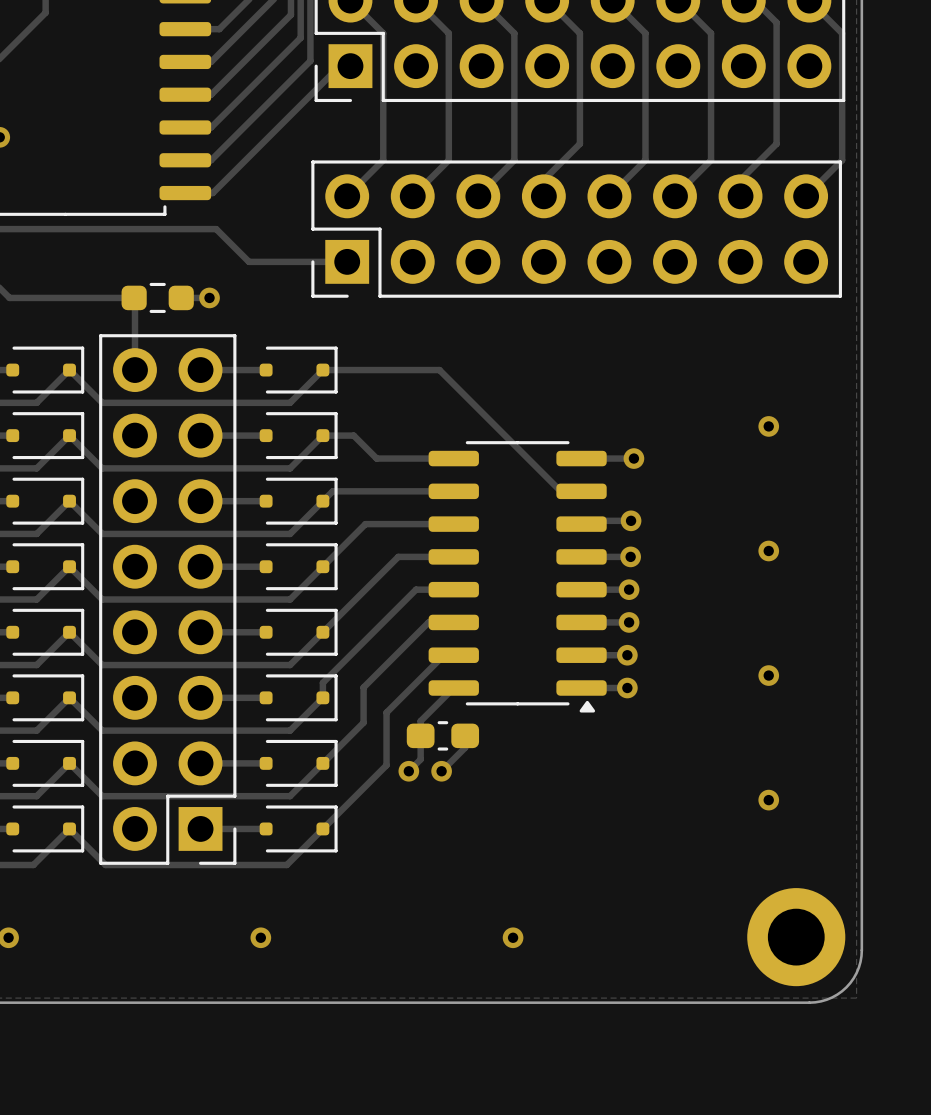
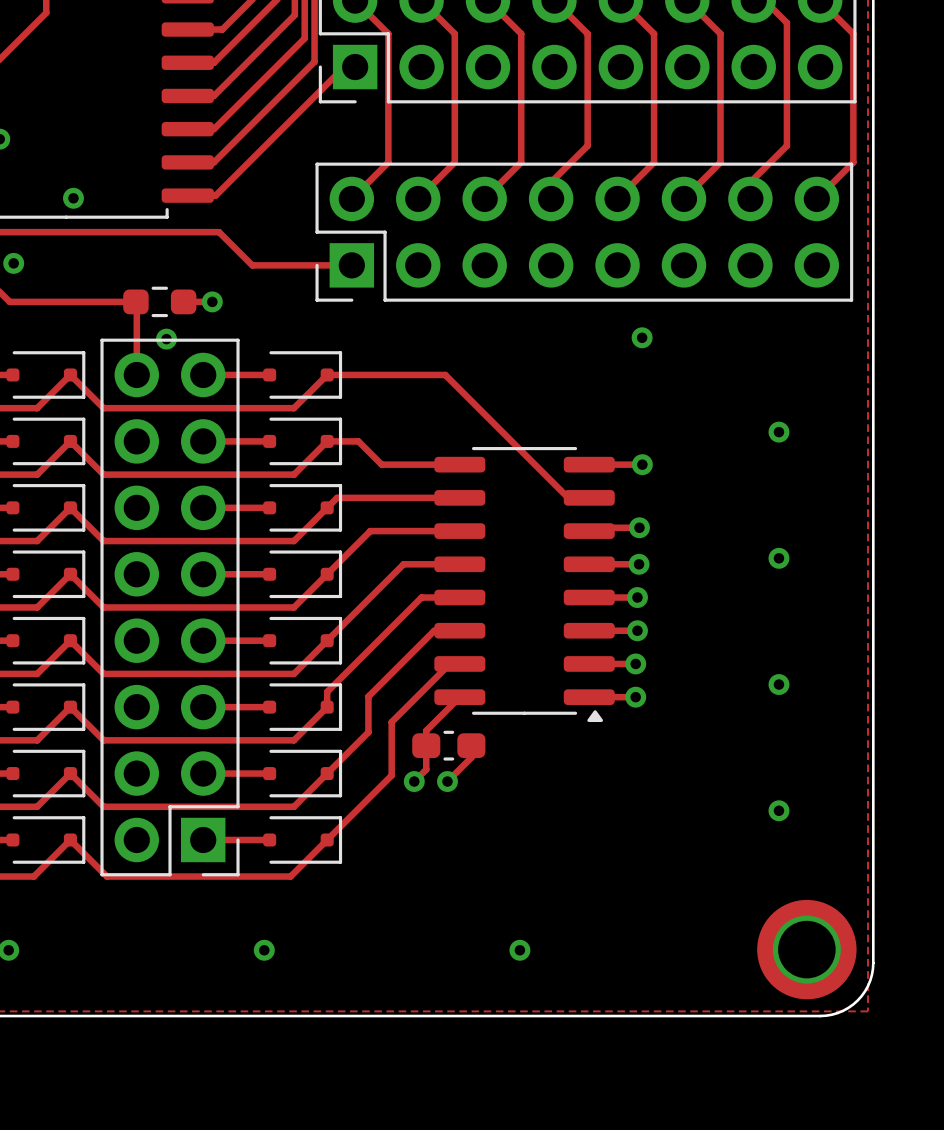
via: none -> (73, 198)
via: none -> (13, 263)
via: none -> (642, 337)
via: none -> (166, 339)

